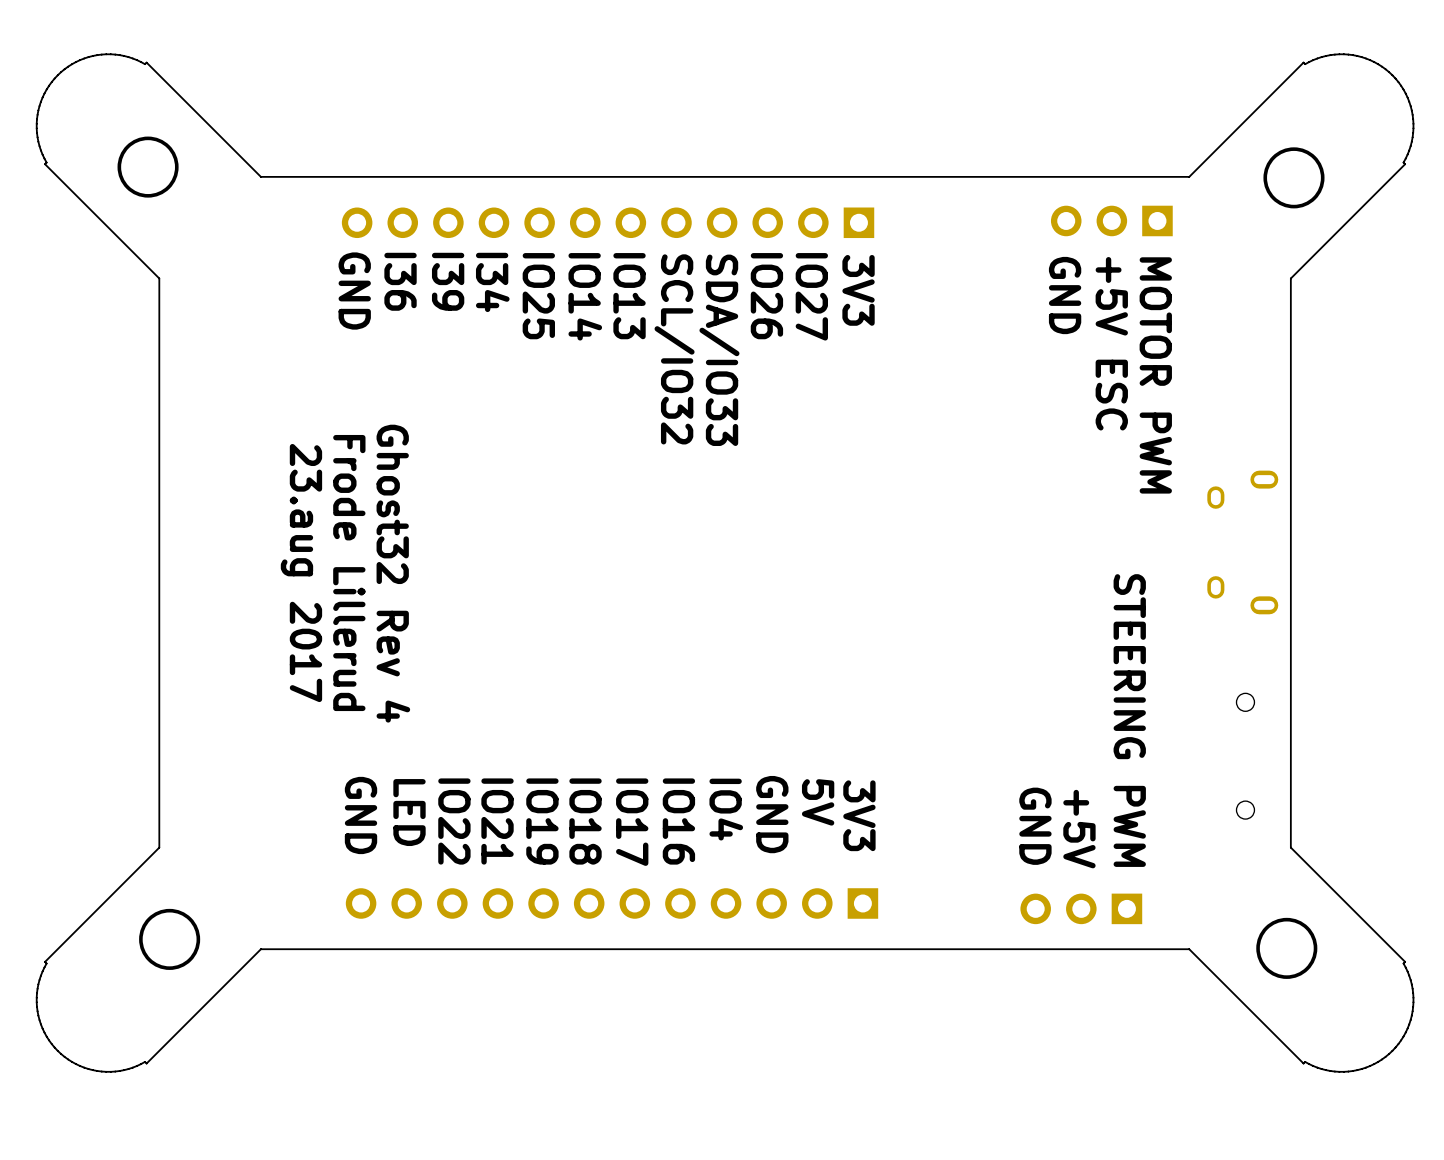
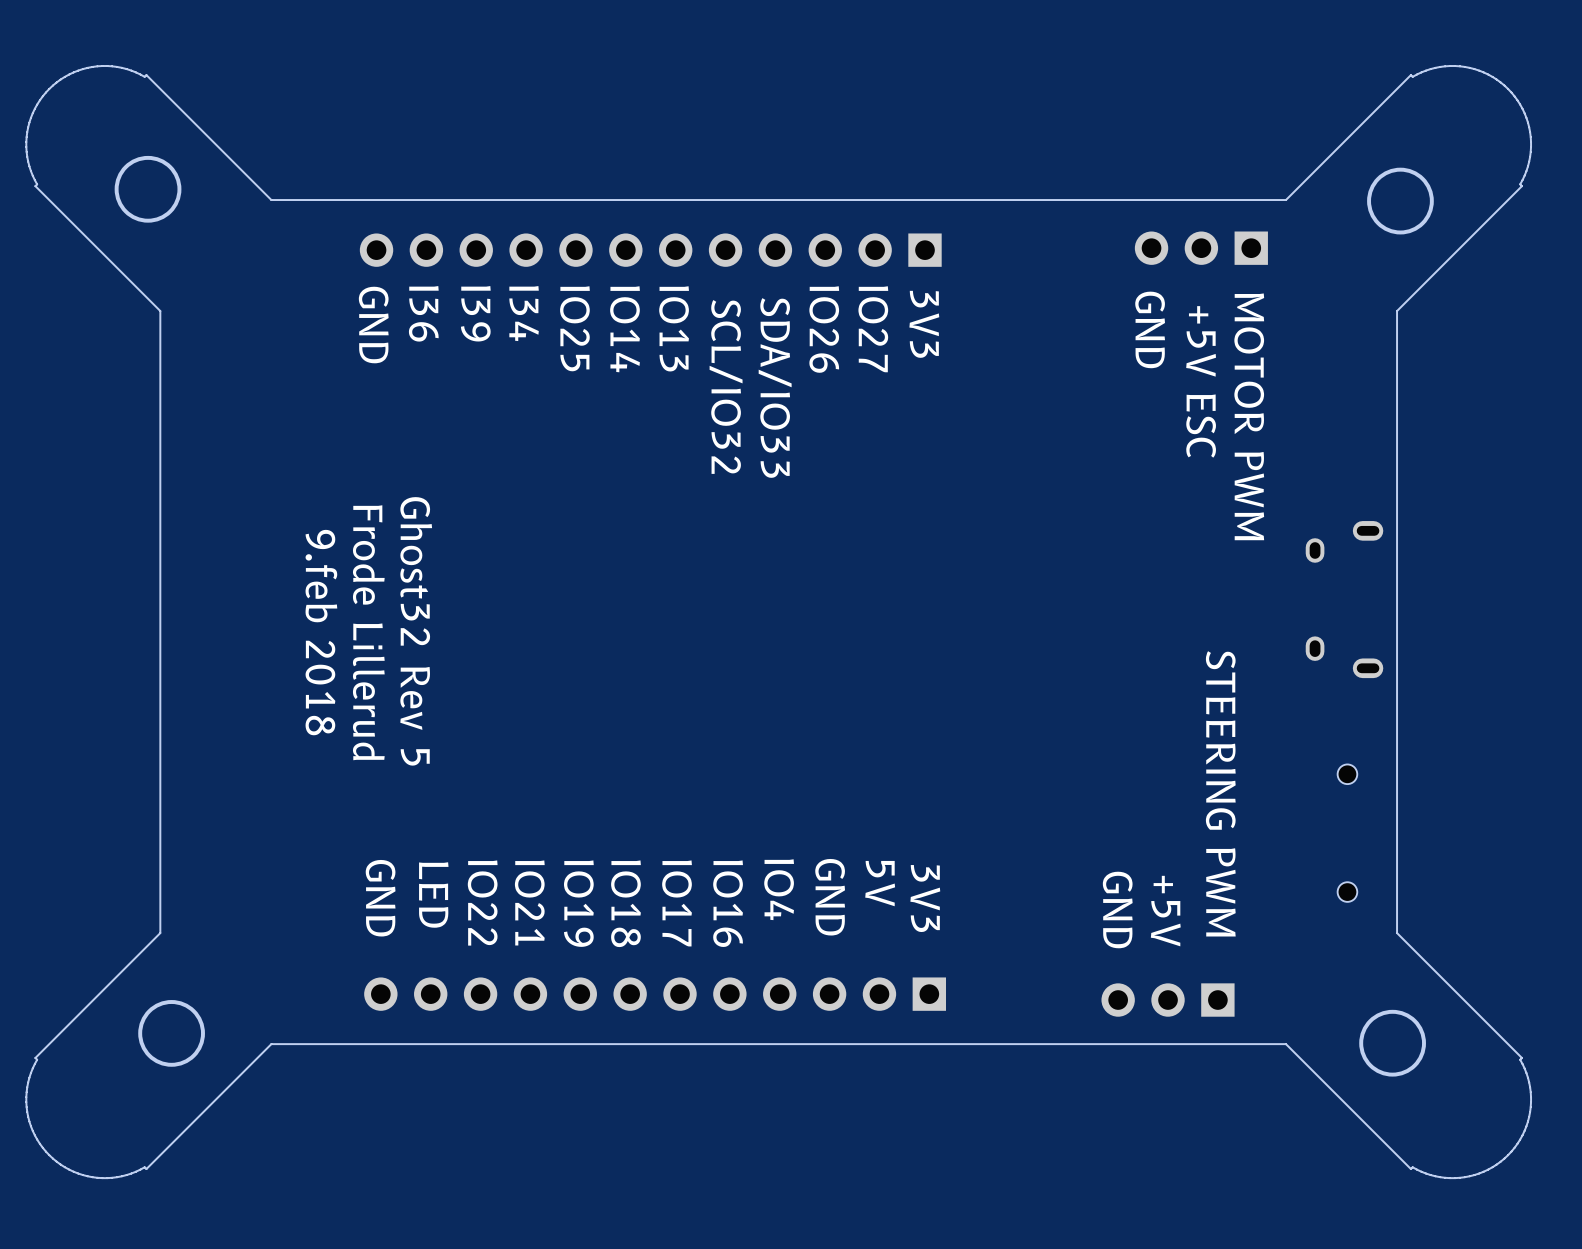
text: 23.aug 2017 (301, 573) -> 9.feb 2018 (321, 632)
text: Ghost32 Rev 4 (393, 573) -> Ghost32 Rev 5 (416, 631)

